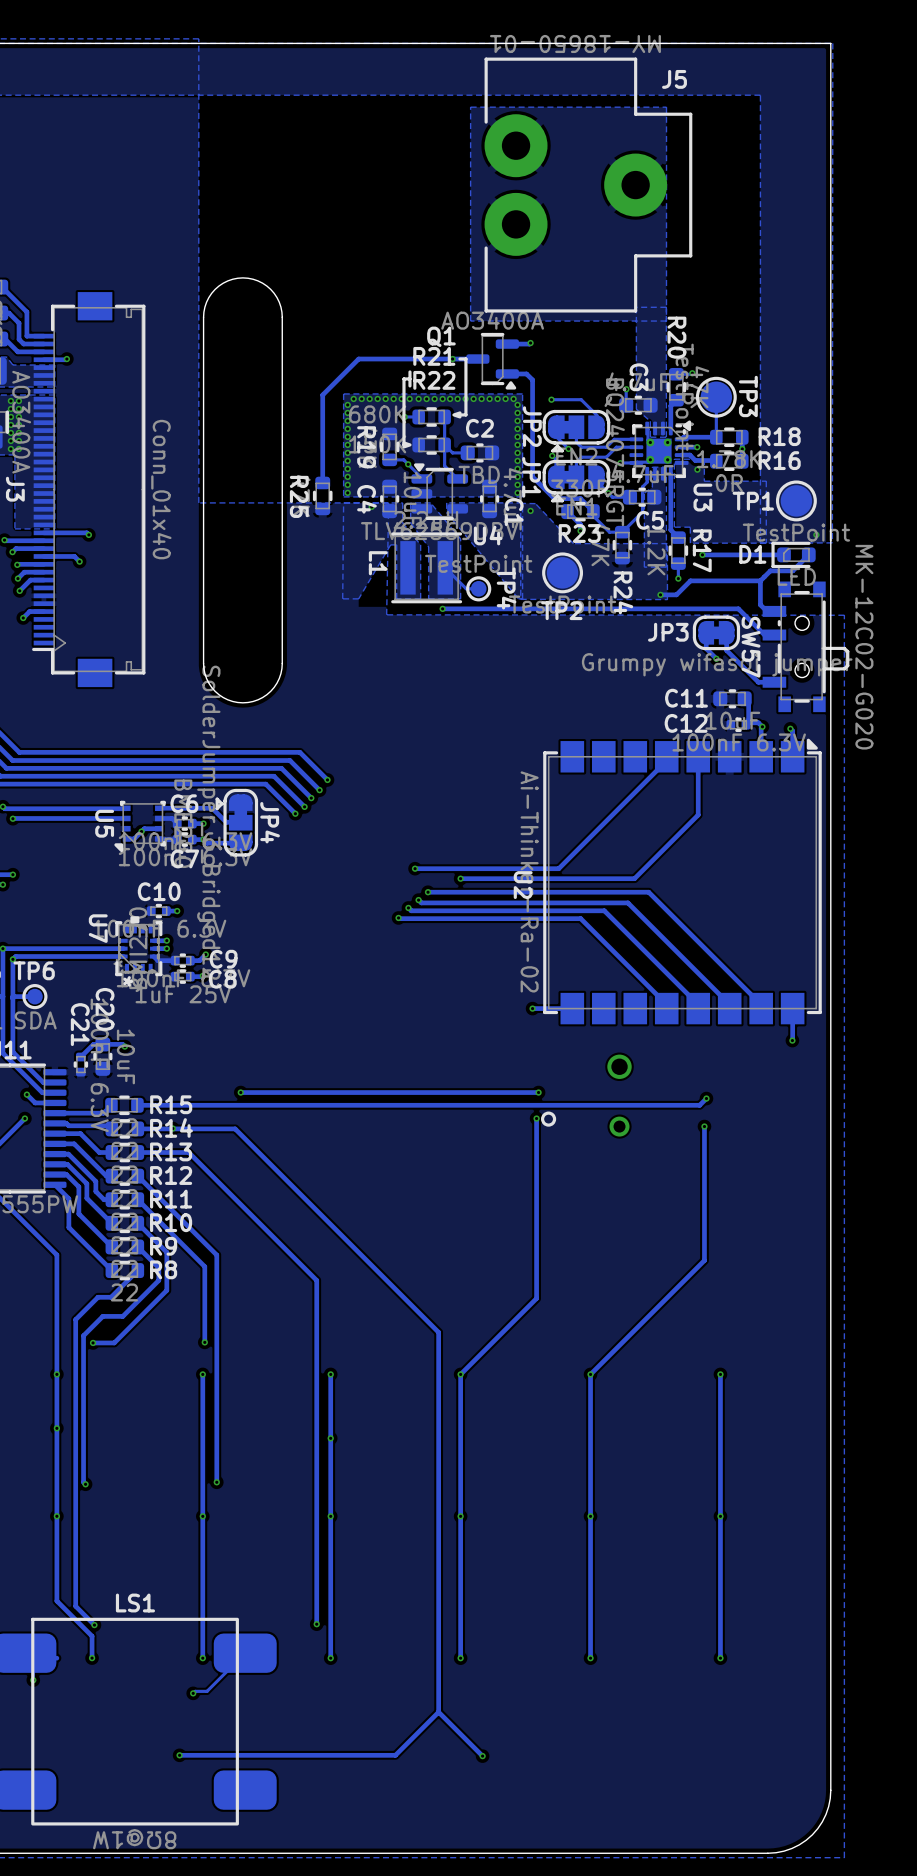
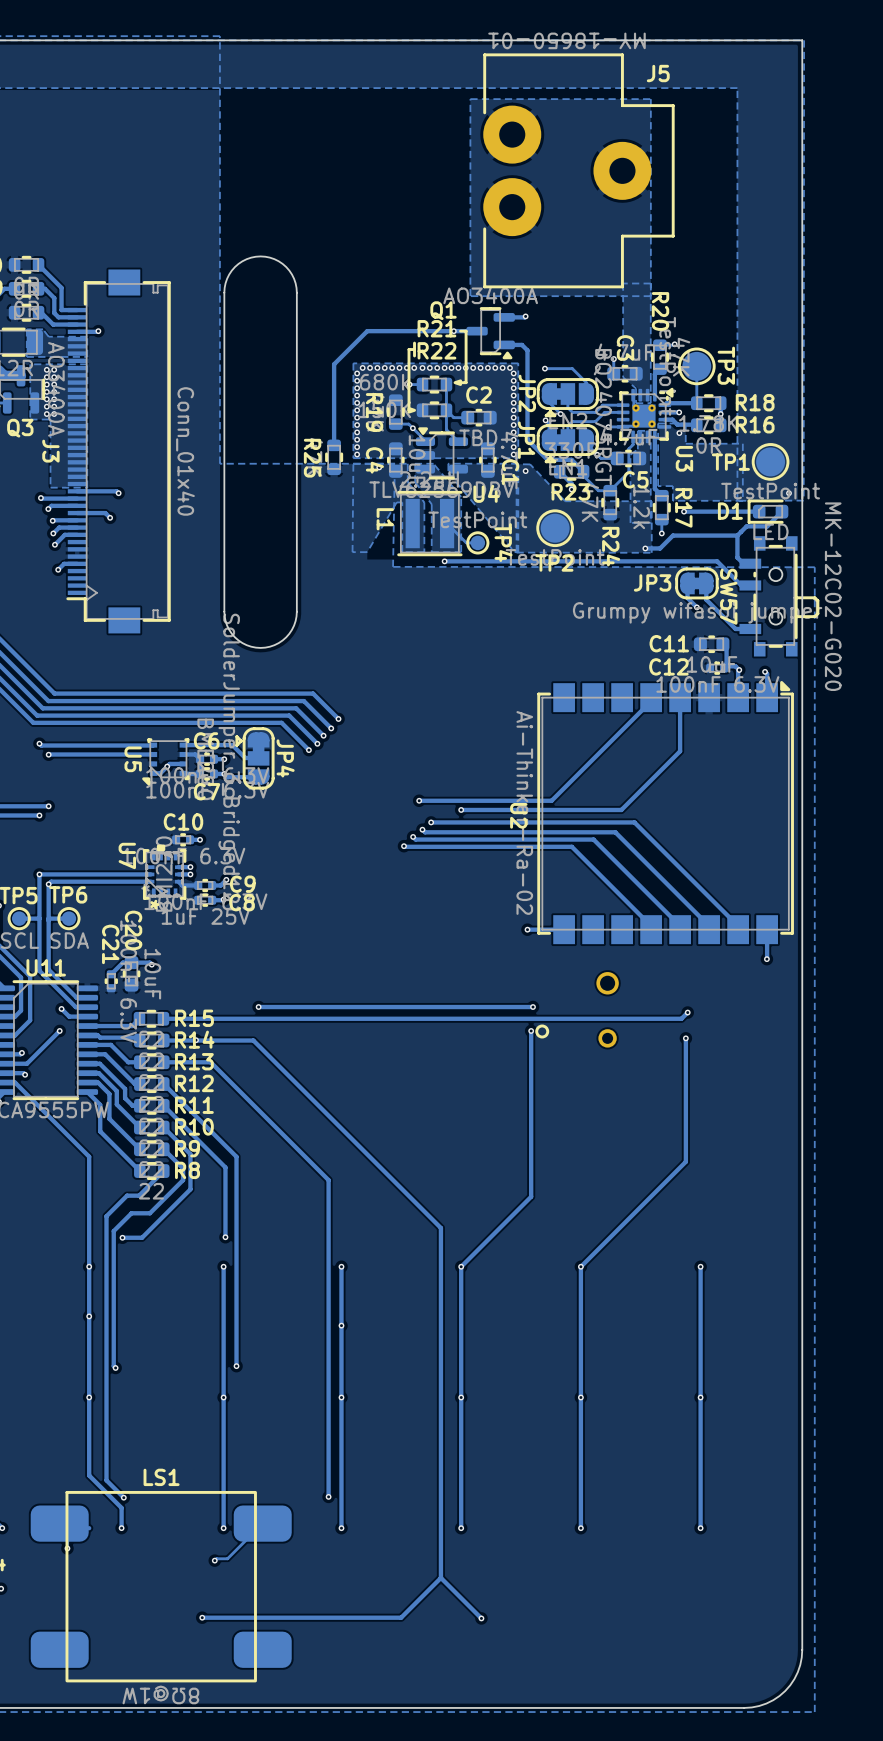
R21 value: 680K (377, 414) -> 680k (384, 382)
R17 value: 1.2K (656, 550) -> 1.2k (641, 507)

